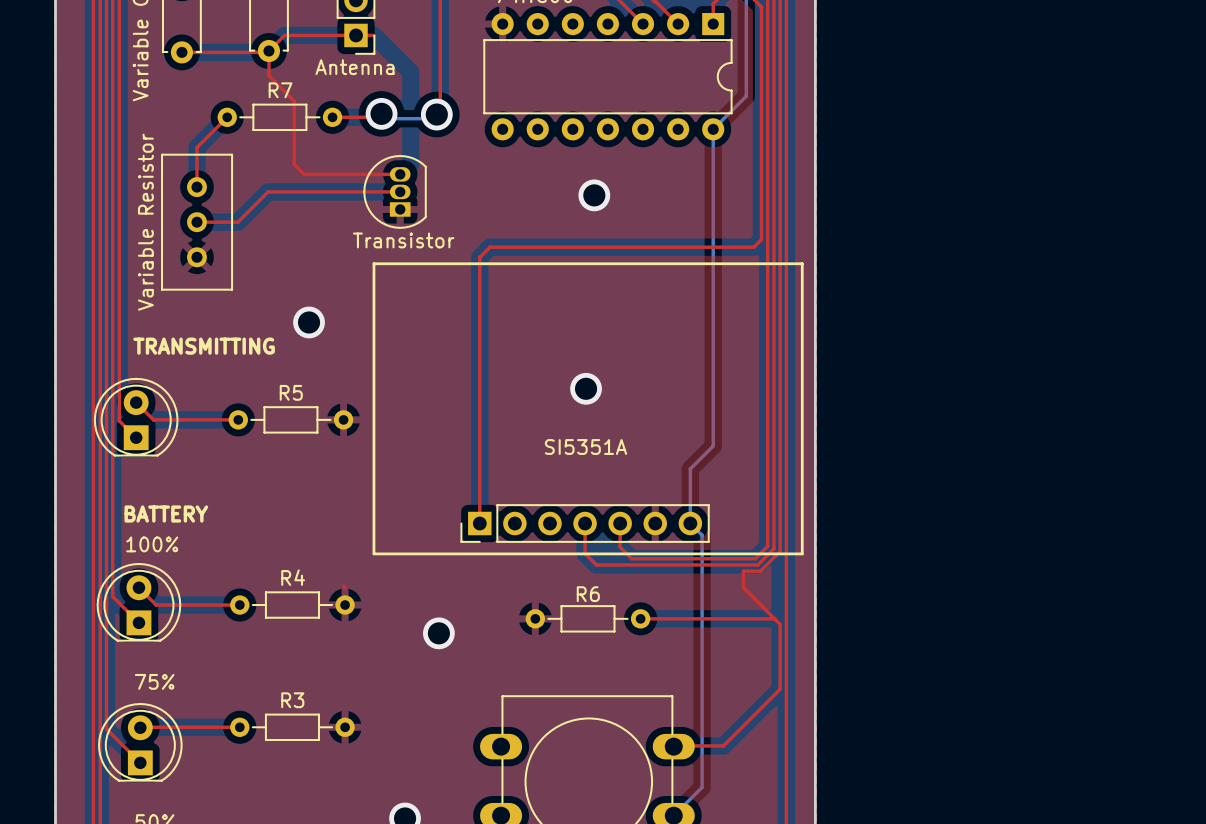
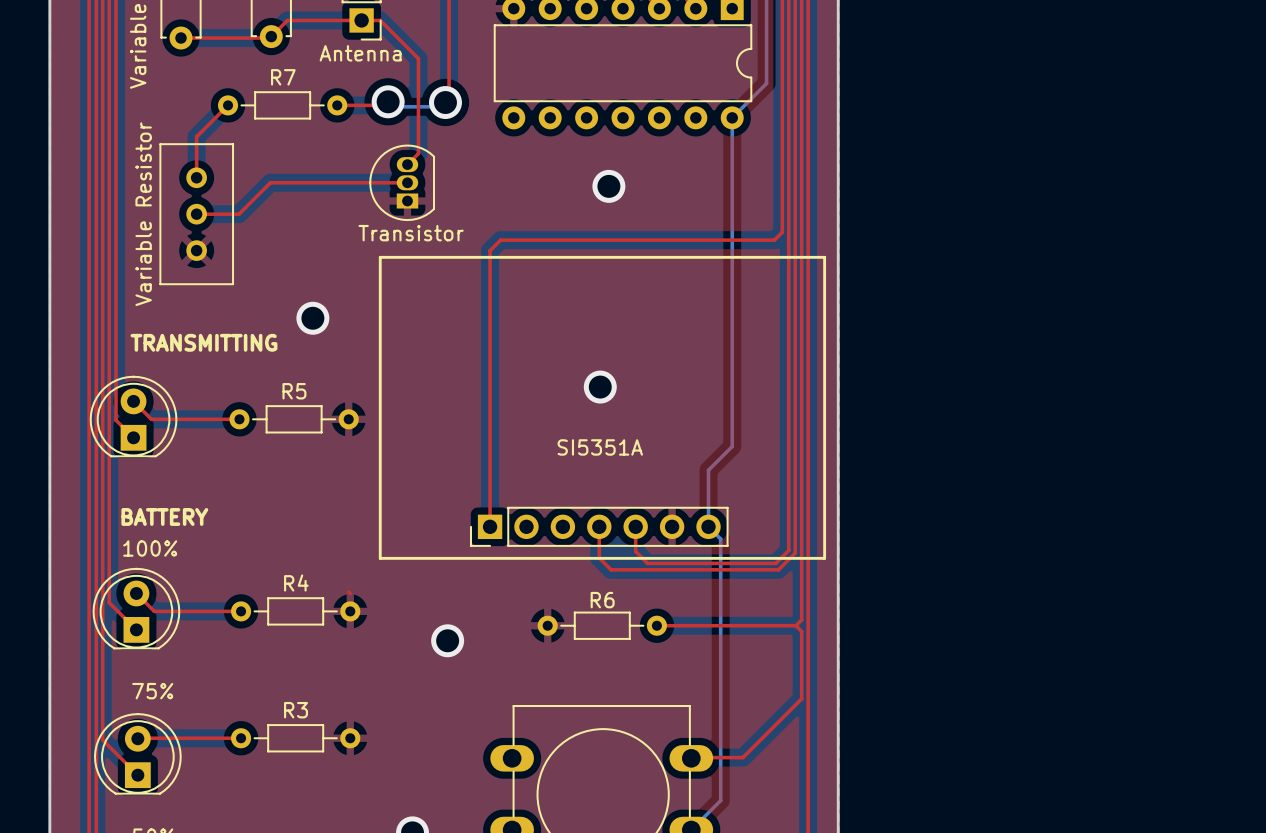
top track: (268, 51) (268, 75) (294, 101) (294, 164) (304, 174) (400, 174) -> (380, 20) (418, 58) (418, 153) (407, 164)
top track: (780, 551) (760, 571) (743, 571) (743, 587) (774, 618) -> (801, 555) (801, 620) (795, 625)

